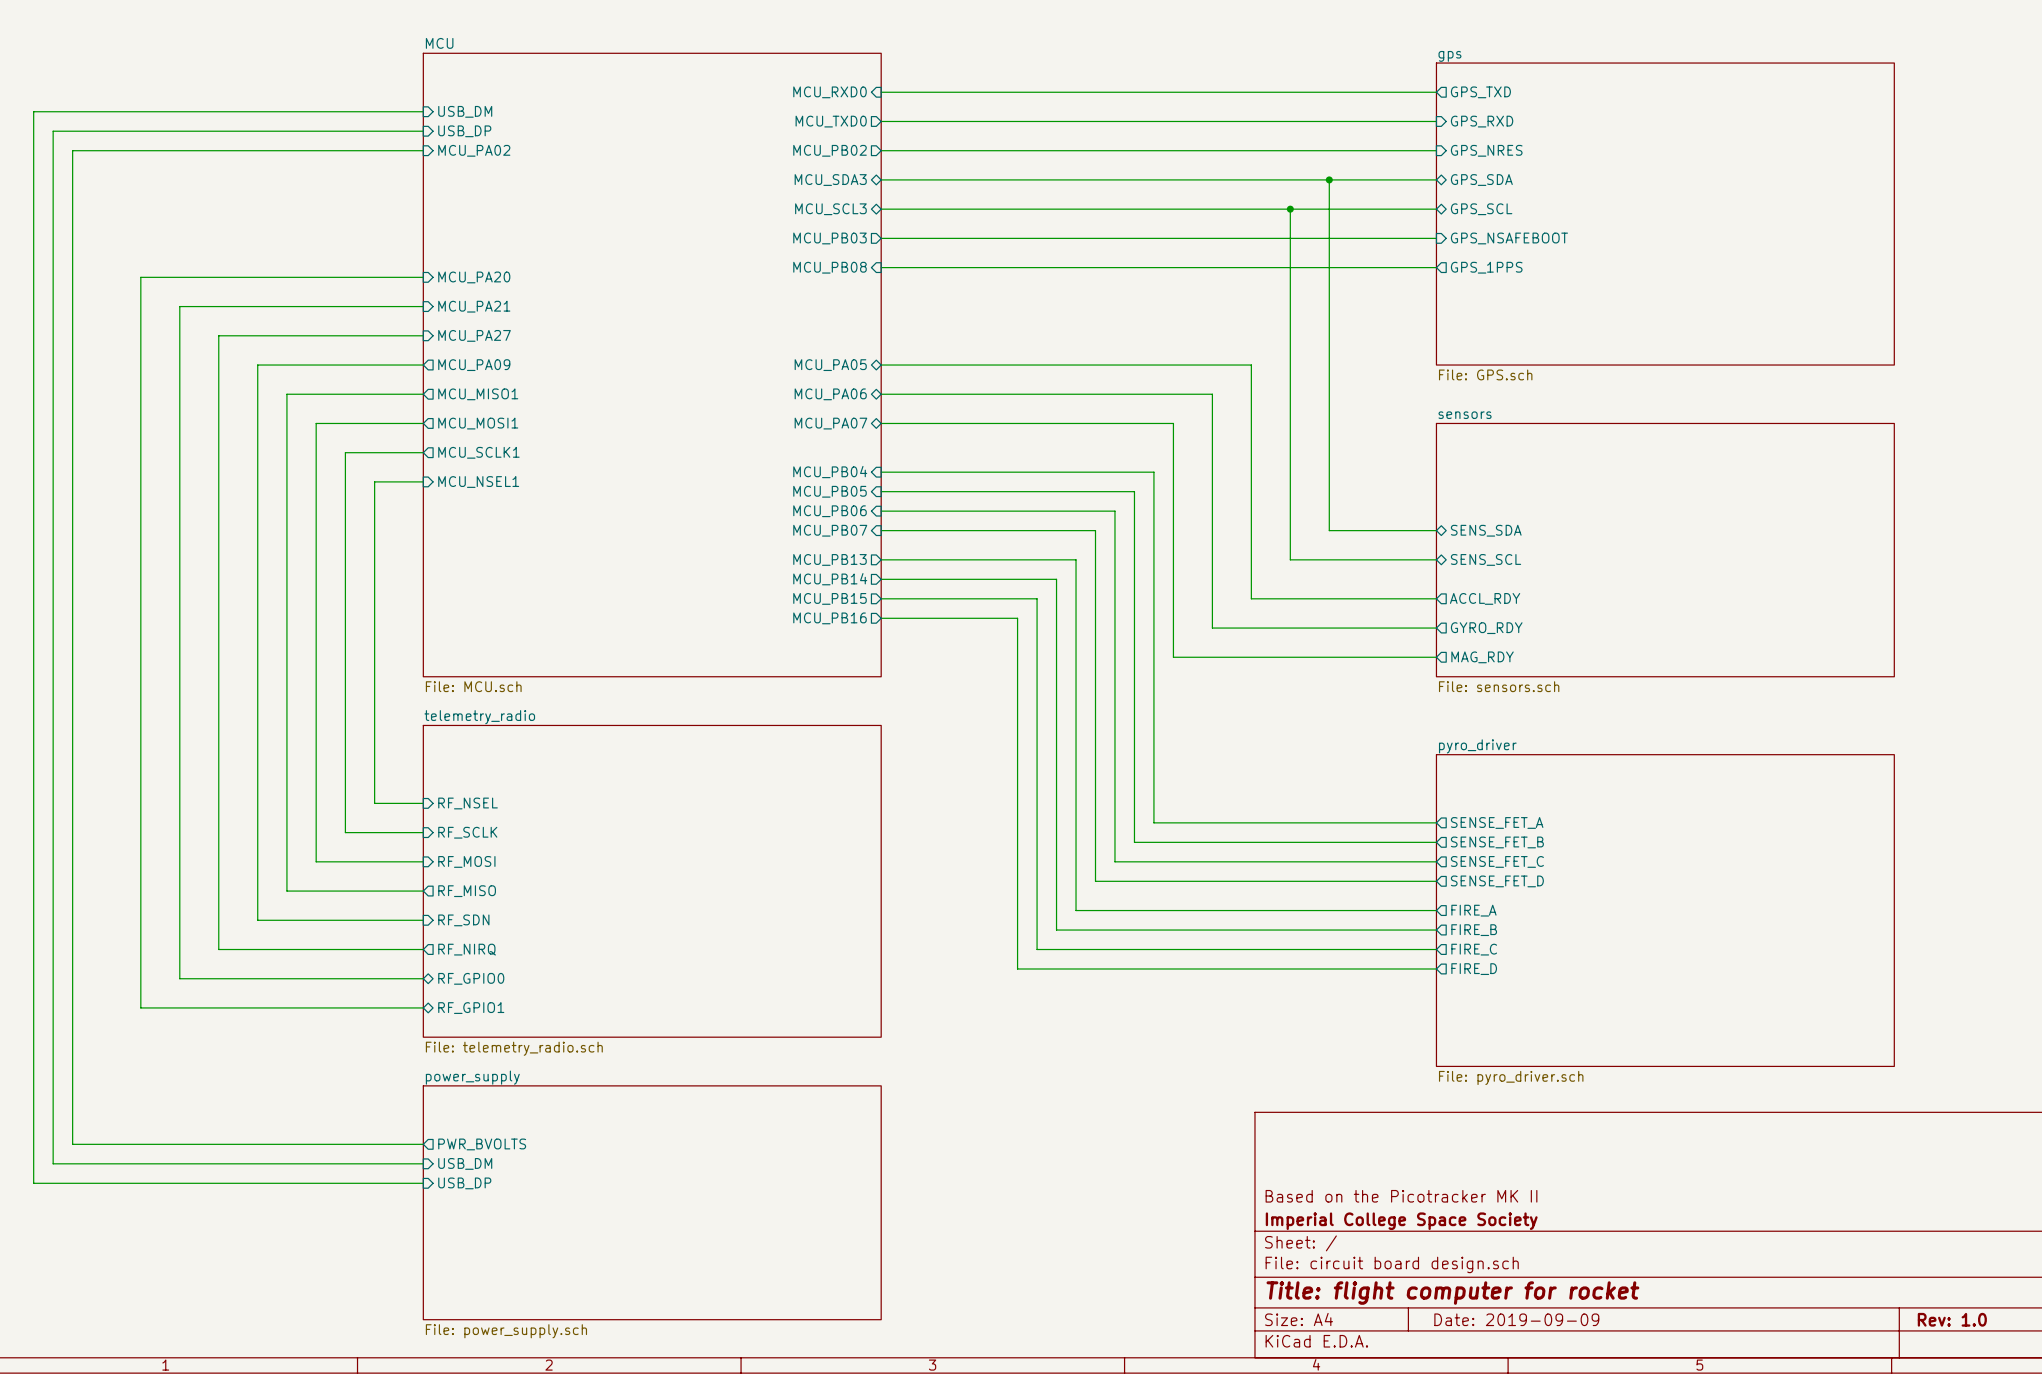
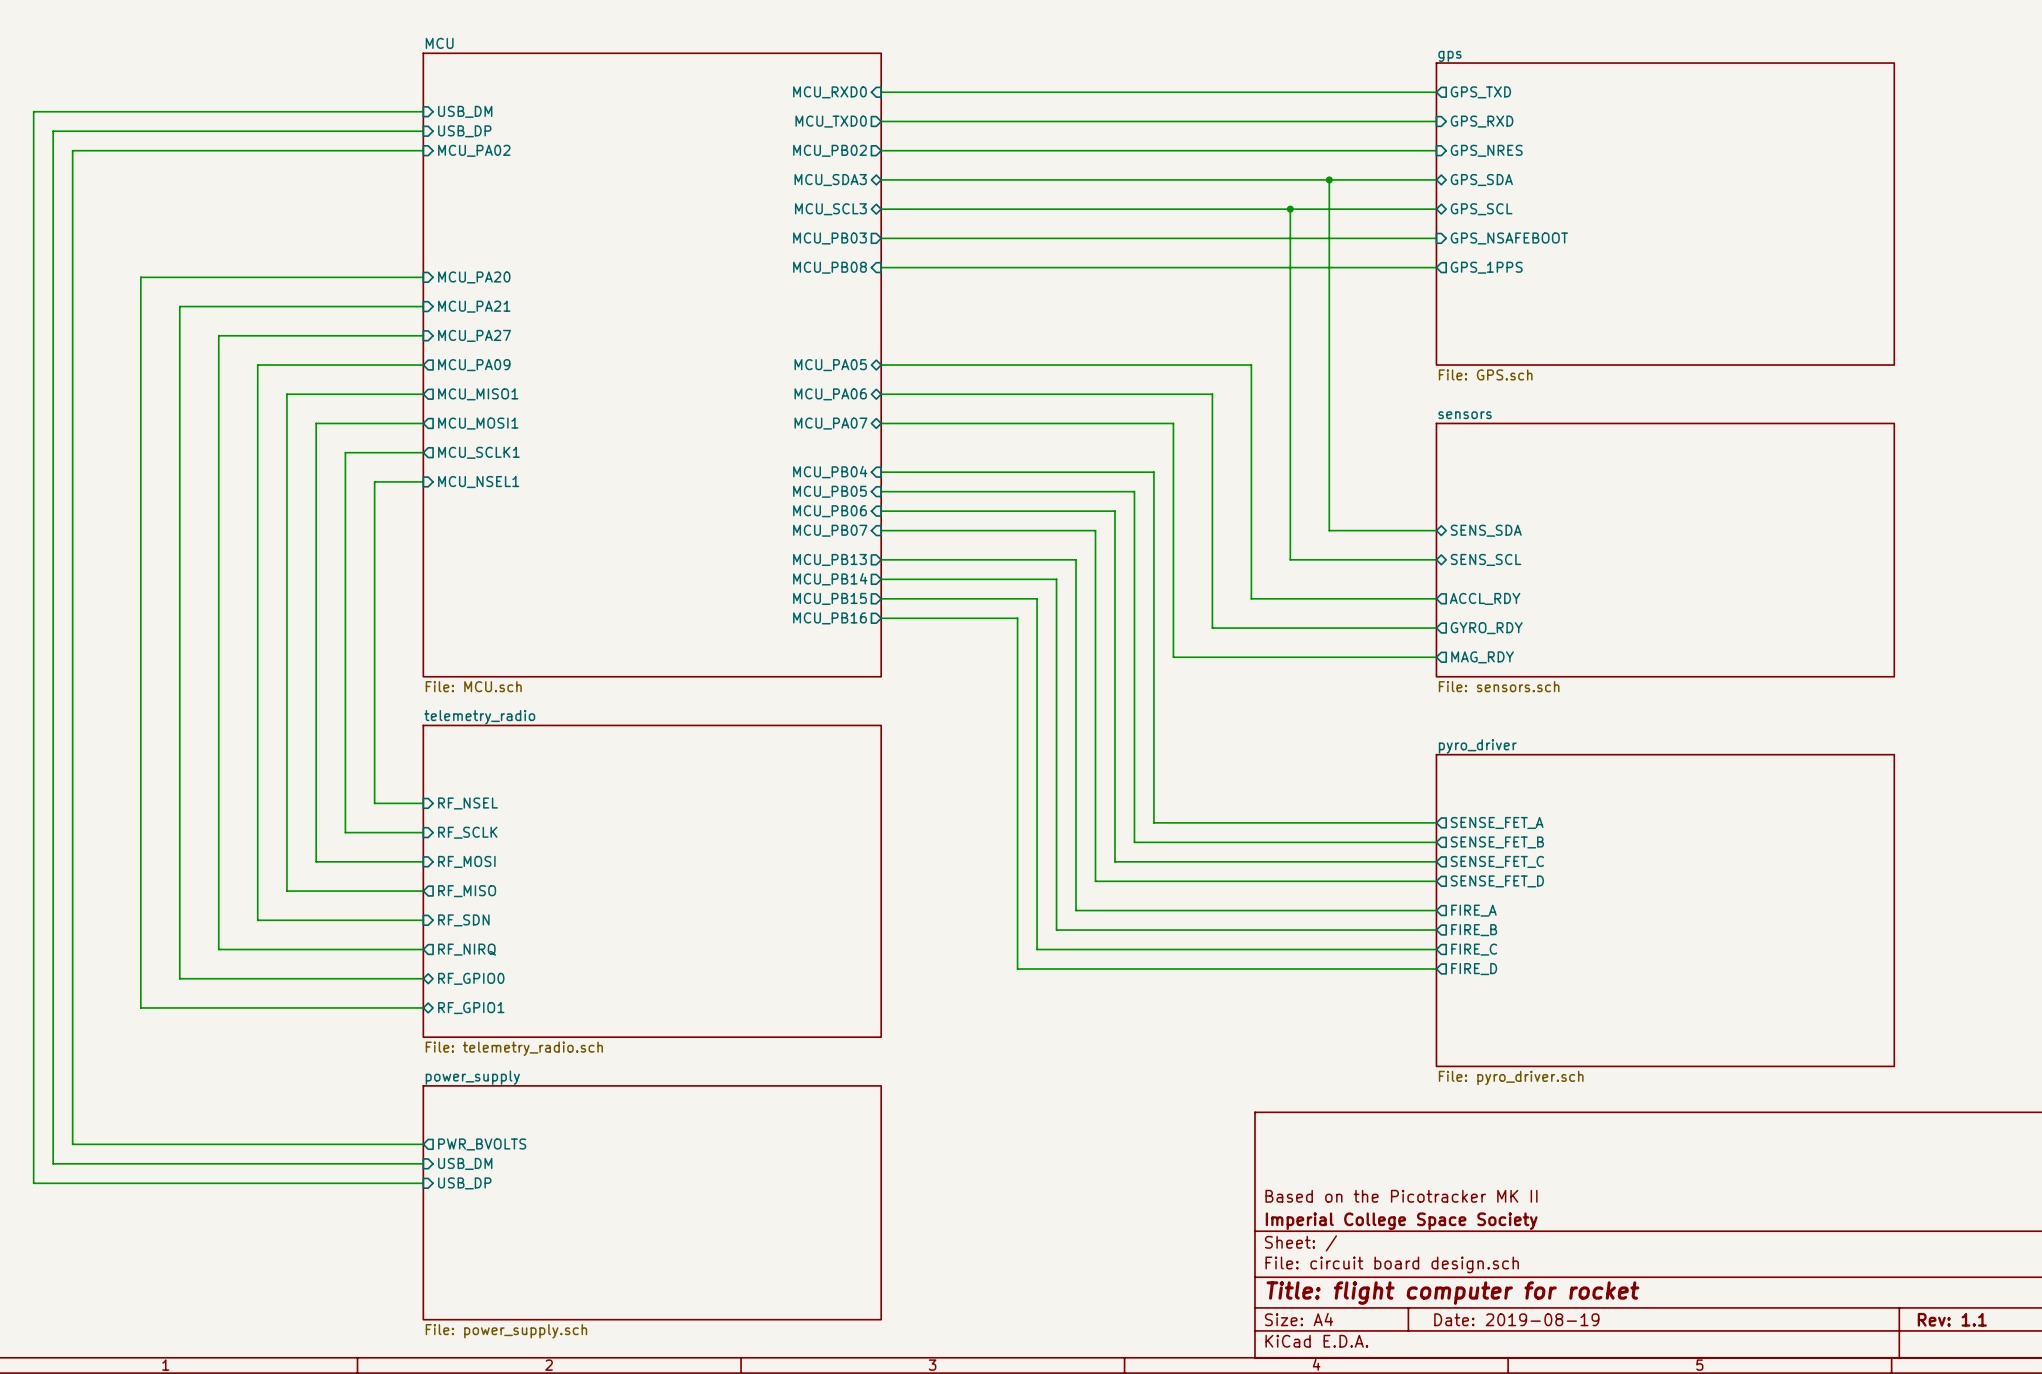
title block: Date: 2019-09-09 (1516, 1319) -> Date: 2019-08-19 (1516, 1319)
title block: Rev: 1.0 (1952, 1319) -> Rev: 1.1 (1952, 1319)

